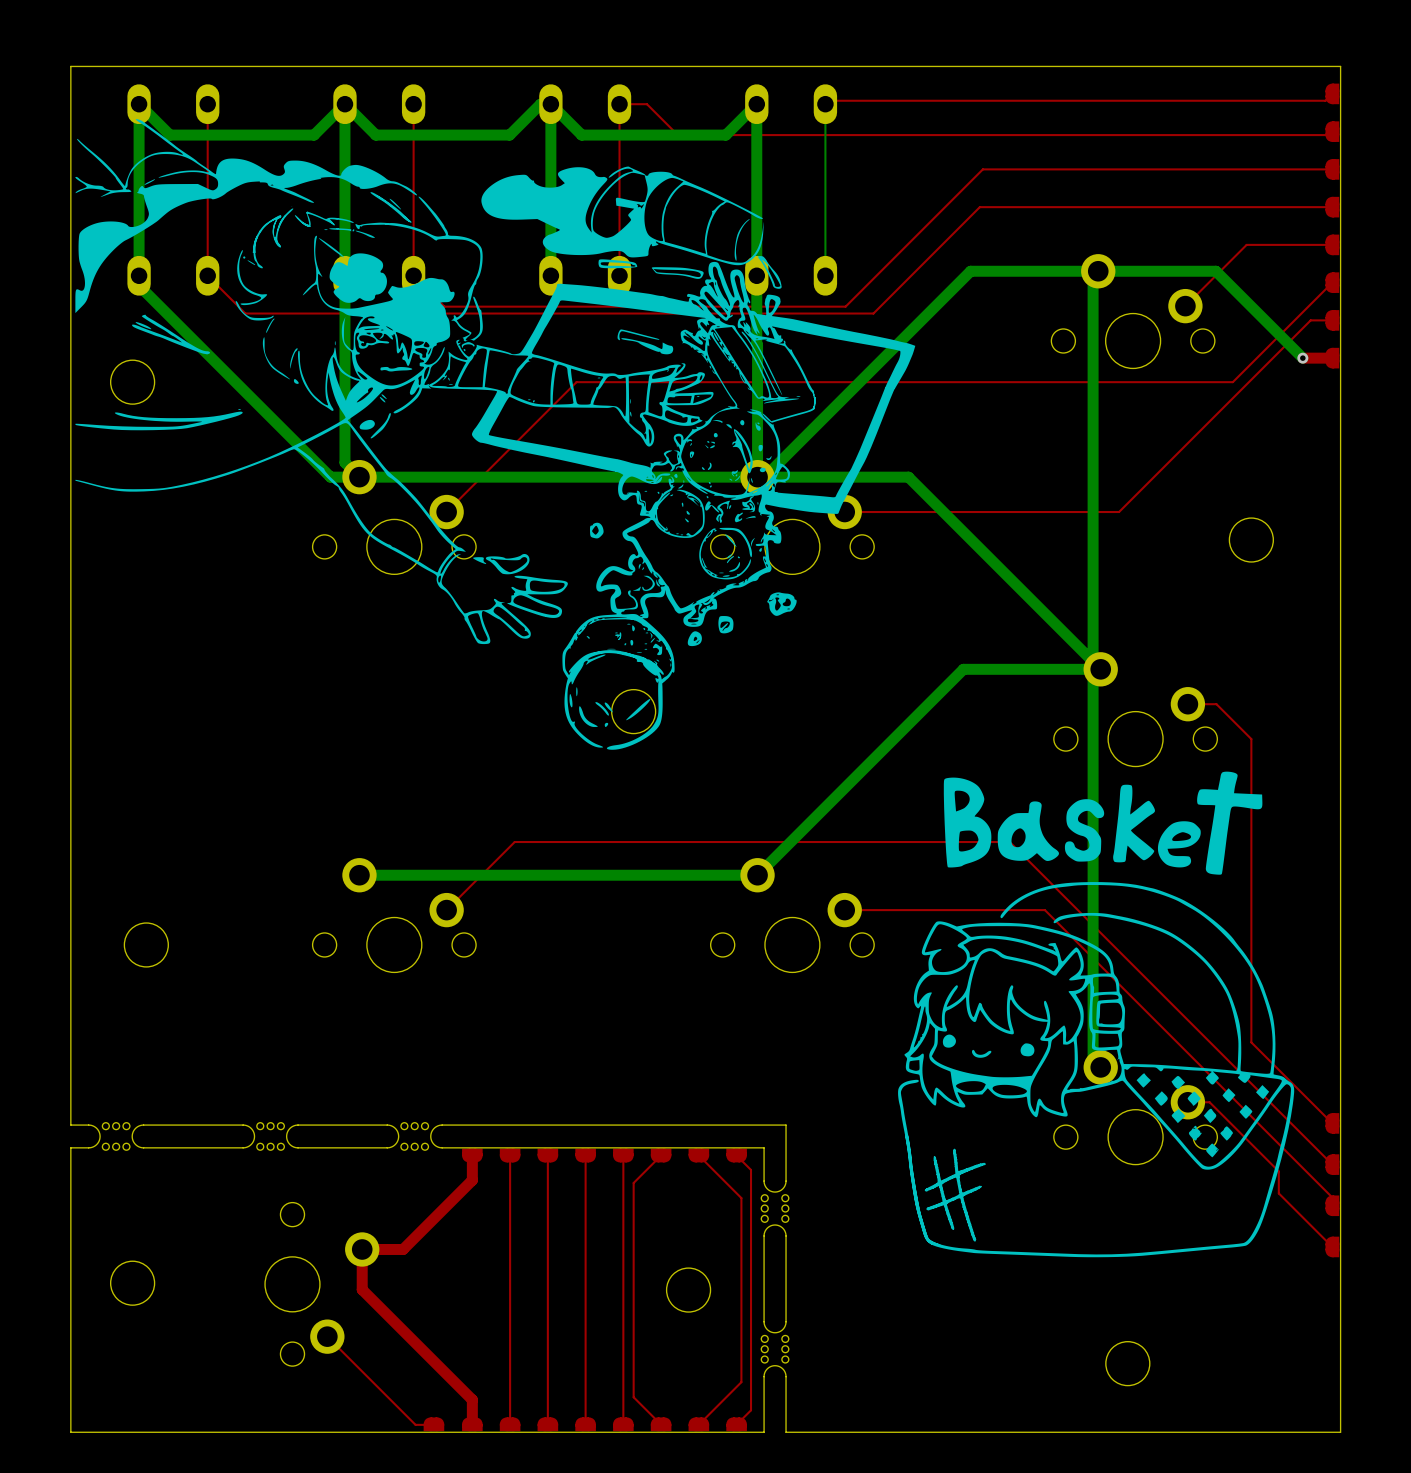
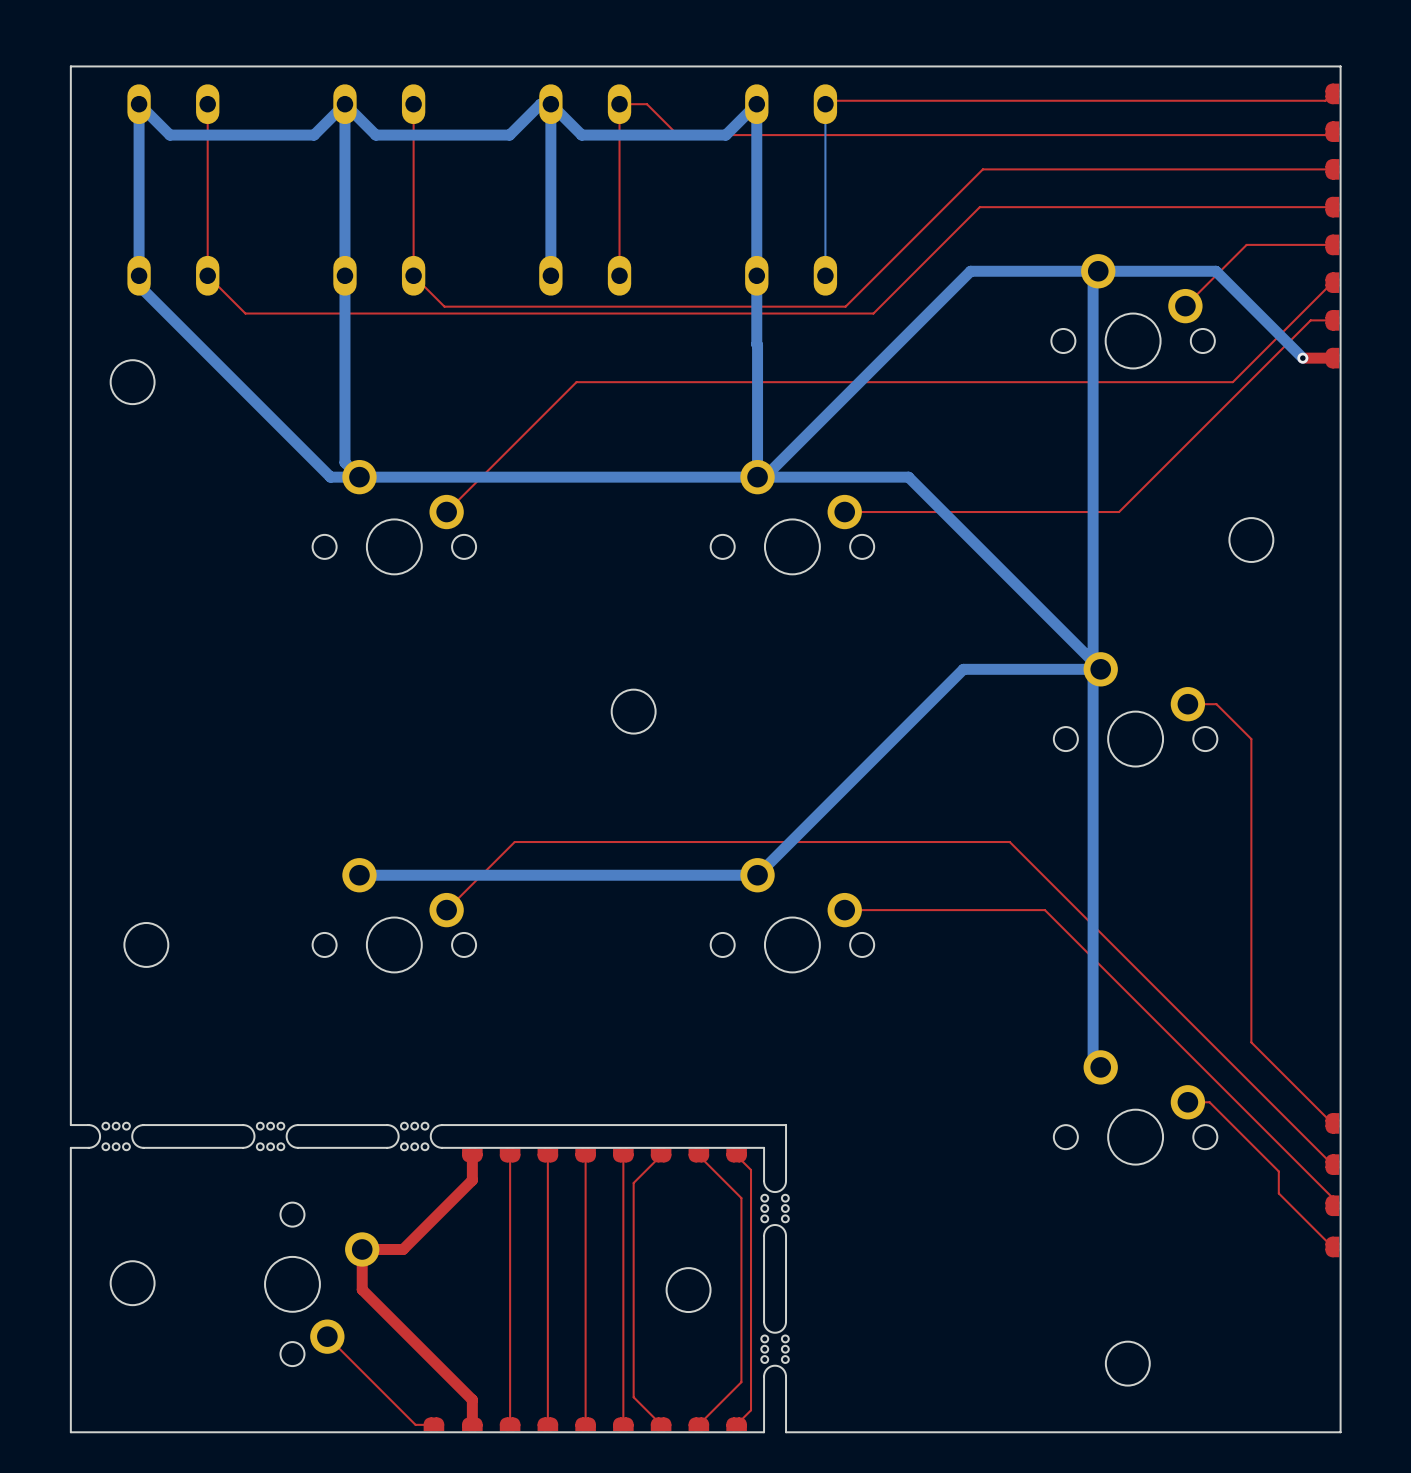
drawing: [75, 119, 916, 750] -> none
line: (813, 392) (814, 397) -> none
line: (814, 398) (814, 401) -> none
line: (814, 402) (814, 402) -> none
line: (814, 403) (814, 406) -> none
drawing: [898, 771, 1295, 1258] -> none

